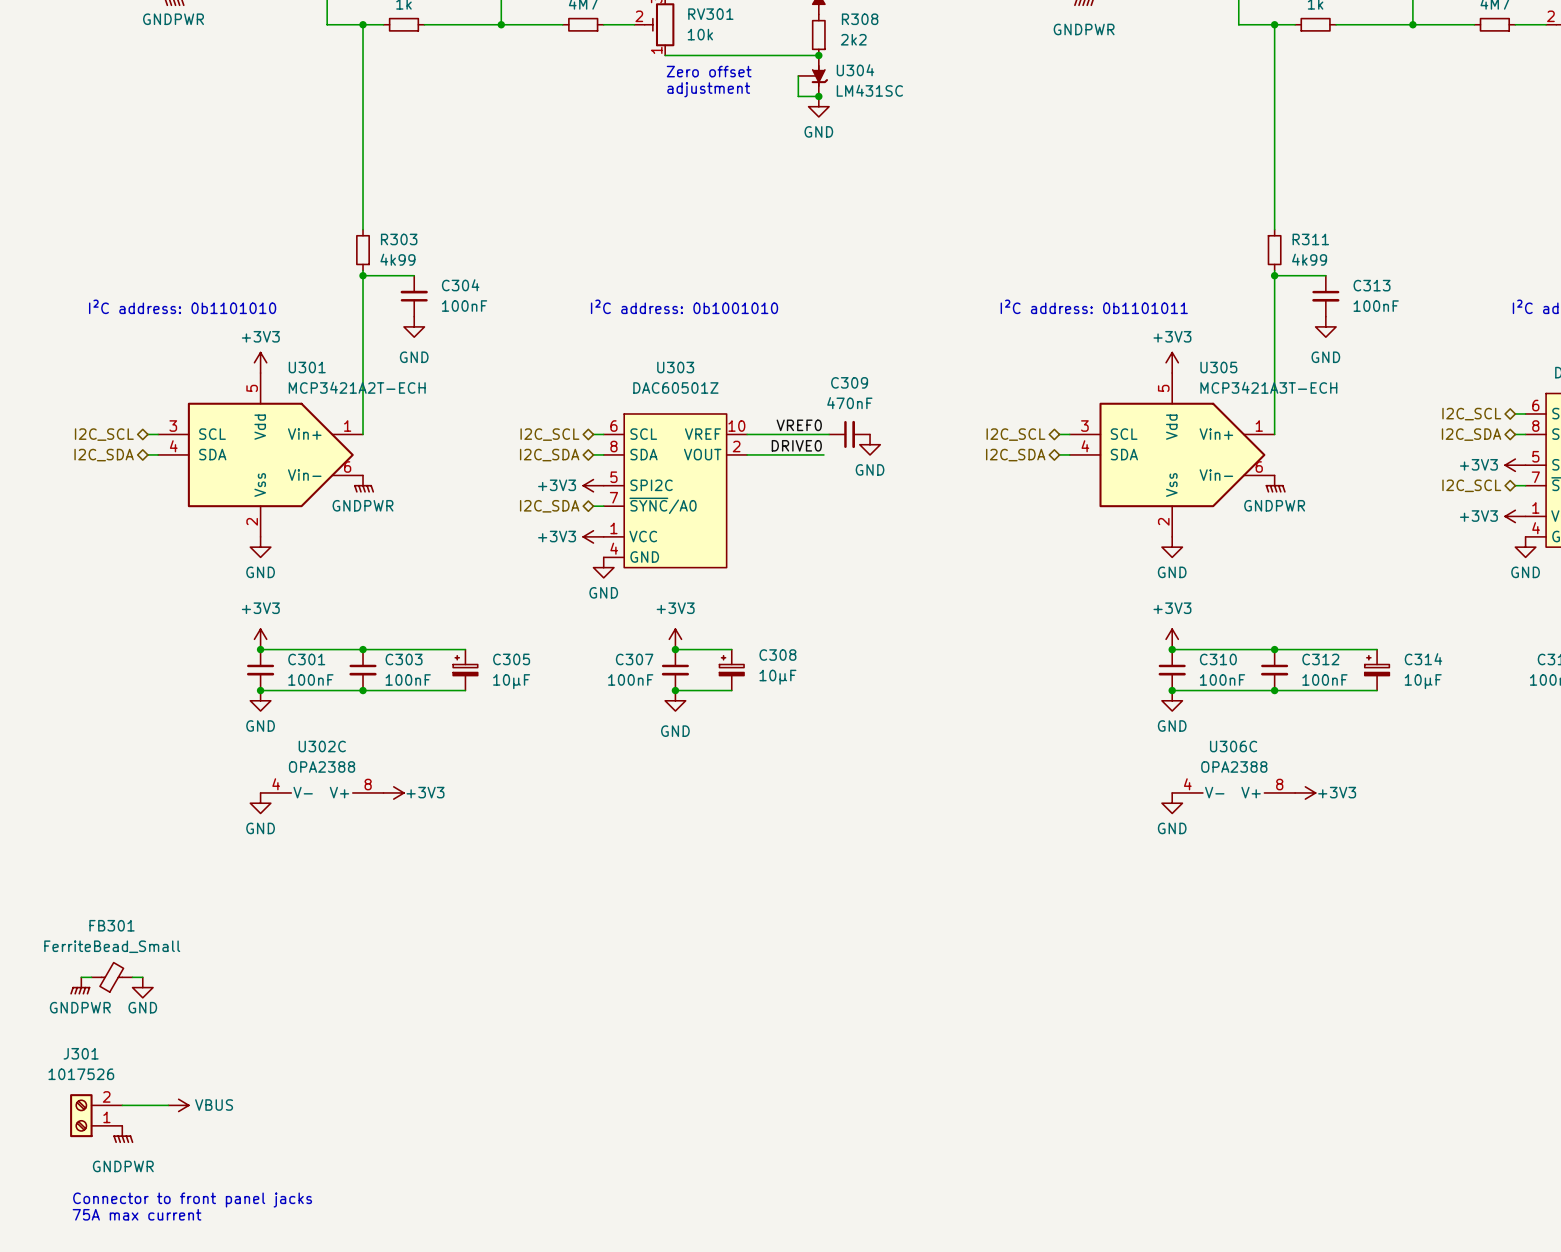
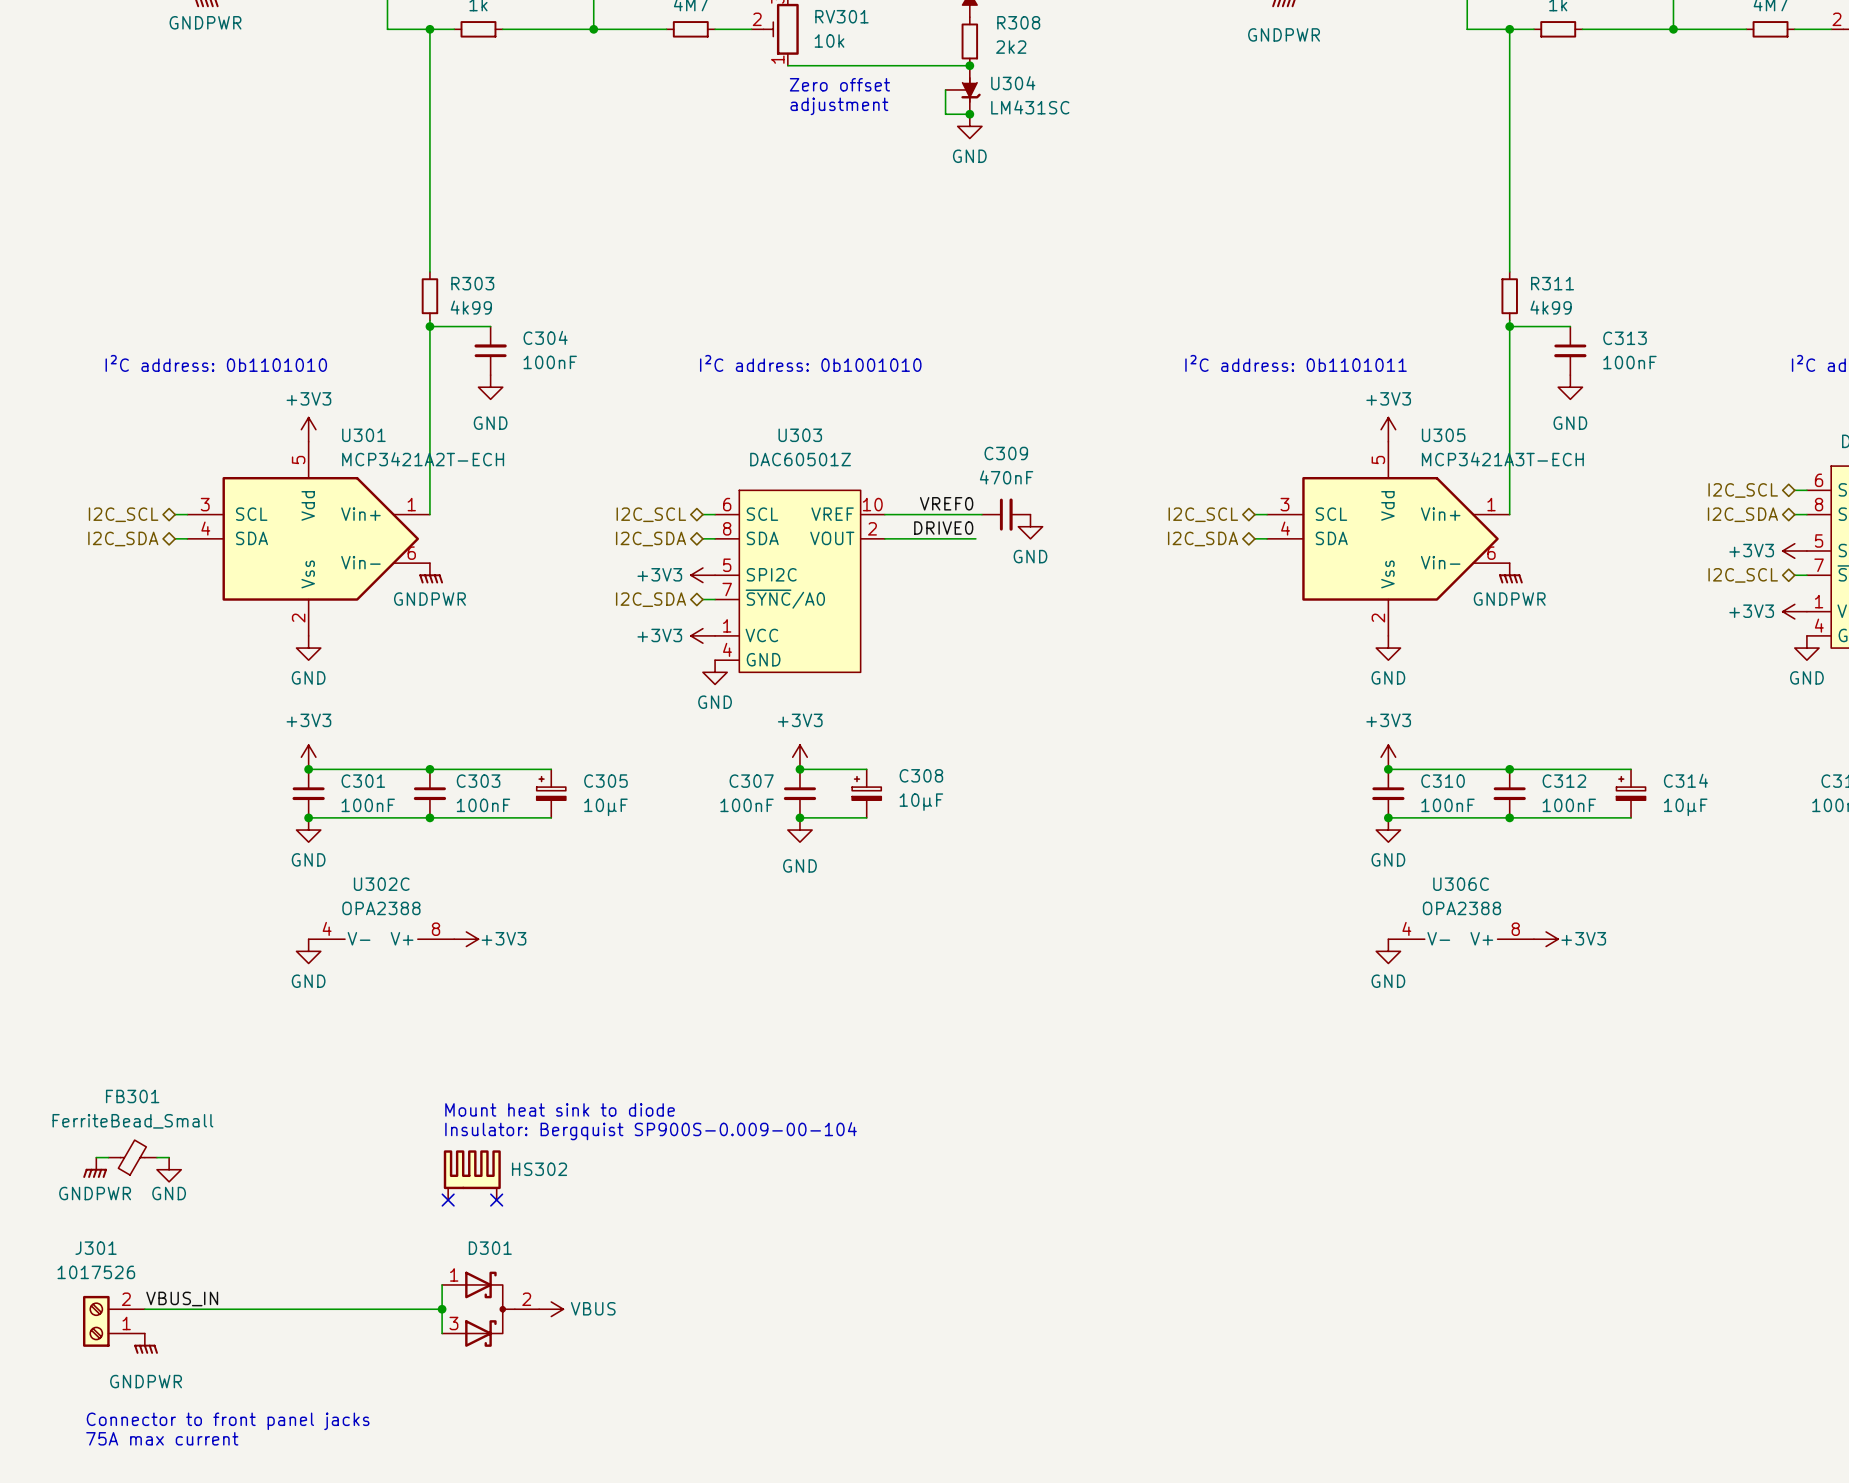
text: none -> Mount heat sink to diode (560, 1109)
text: none -> Insulator: Bergquist SP900S-0.009-00-104 (651, 1131)
HS302: none -> (472, 1175)
no-connect mark: none -> (448, 1200)
no-connect mark: none -> (496, 1200)
wire: none -> (442, 1284) (442, 1333)
label: none -> VBUS_IN (182, 1298)
wire: none -> (199, 1309) (442, 1309)
power symbol: VBUS (178, 1105) -> none
junction: none -> (442, 1309)
D301: none -> (490, 1309)
power symbol: none -> VBUS (551, 1309)

